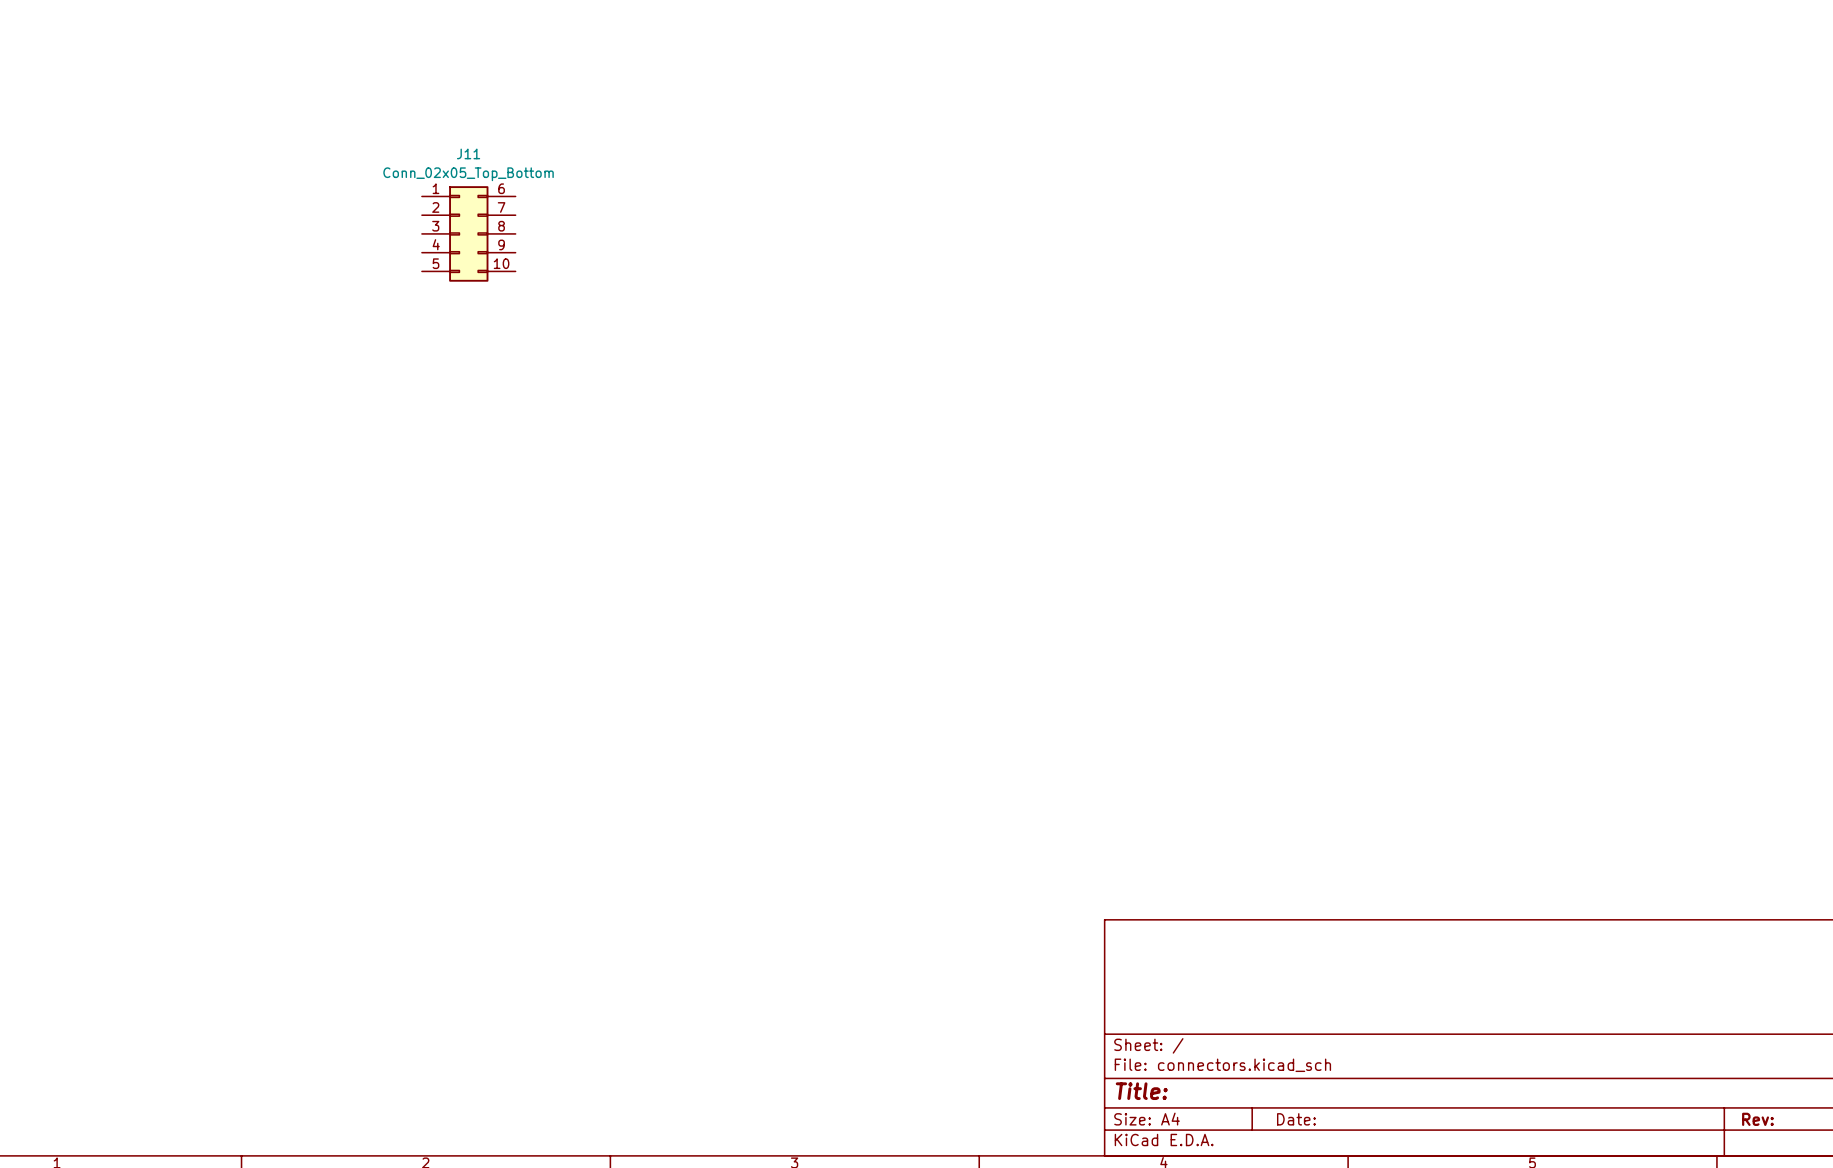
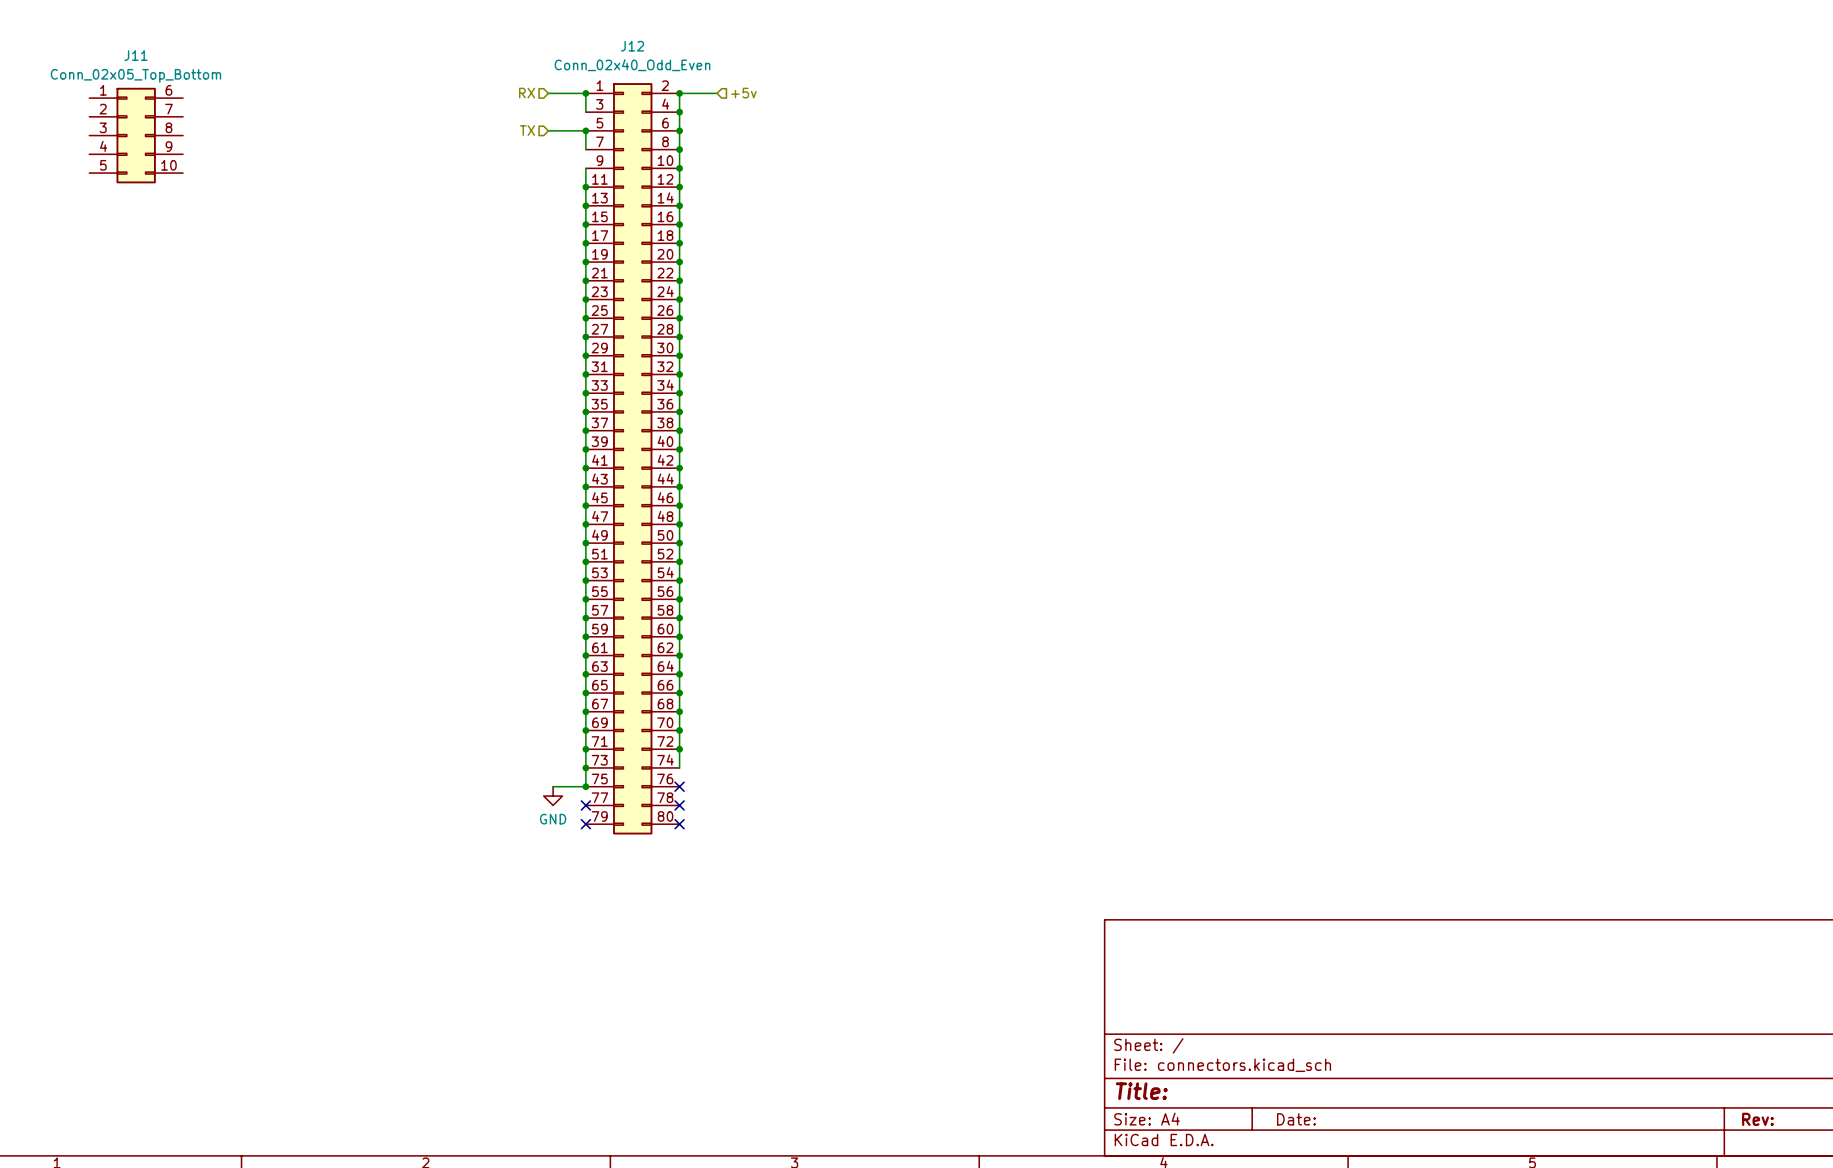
hierarchical label: none -> RX (527, 93)
wire: none -> (548, 93) (585, 93) (585, 112)
junction: none -> (585, 93)
junction: none -> (679, 93)
wire: none -> (717, 93) (679, 93) (679, 767)
hierarchical label: none -> +5v (743, 93)
junction: none -> (679, 112)
hierarchical label: none -> TX (527, 130)
wire: none -> (548, 130) (585, 130) (585, 149)
junction: none -> (585, 130)
junction: none -> (679, 130)
junction: none -> (679, 149)
wire: none -> (585, 168) (585, 786) (553, 786)
junction: none -> (679, 168)
junction: none -> (585, 187)
junction: none -> (679, 187)
junction: none -> (585, 205)
junction: none -> (679, 205)
junction: none -> (585, 224)
junction: none -> (679, 224)
J11 position: (468, 233) -> (136, 135)
junction: none -> (585, 243)
junction: none -> (679, 243)
junction: none -> (585, 262)
junction: none -> (679, 262)
junction: none -> (585, 280)
junction: none -> (679, 280)
junction: none -> (585, 299)
junction: none -> (679, 299)
junction: none -> (585, 318)
junction: none -> (679, 318)
junction: none -> (585, 337)
junction: none -> (679, 337)
junction: none -> (585, 355)
junction: none -> (679, 355)
junction: none -> (585, 374)
junction: none -> (679, 374)
junction: none -> (585, 393)
junction: none -> (679, 393)
junction: none -> (585, 411)
junction: none -> (679, 411)
junction: none -> (585, 430)
junction: none -> (679, 430)
junction: none -> (585, 449)
junction: none -> (679, 449)
J12: none -> Conn_02x40_Odd_Even (632, 458)
junction: none -> (585, 468)
junction: none -> (679, 468)
junction: none -> (585, 486)
junction: none -> (679, 486)
junction: none -> (585, 505)
junction: none -> (679, 505)
junction: none -> (585, 524)
junction: none -> (679, 524)
junction: none -> (585, 543)
junction: none -> (679, 543)
junction: none -> (585, 561)
junction: none -> (679, 561)
junction: none -> (585, 580)
junction: none -> (679, 580)
junction: none -> (585, 599)
junction: none -> (679, 599)
junction: none -> (585, 618)
junction: none -> (679, 618)
junction: none -> (585, 636)
junction: none -> (679, 636)
junction: none -> (585, 655)
junction: none -> (679, 655)
junction: none -> (585, 674)
junction: none -> (679, 674)
junction: none -> (585, 693)
junction: none -> (679, 693)
junction: none -> (585, 711)
junction: none -> (679, 711)
junction: none -> (585, 730)
junction: none -> (679, 730)
junction: none -> (585, 749)
junction: none -> (679, 749)
junction: none -> (585, 767)
junction: none -> (585, 786)
no-connect mark: none -> (679, 786)
power symbol: none -> GND (553, 796)
no-connect mark: none -> (585, 805)
no-connect mark: none -> (679, 805)
no-connect mark: none -> (585, 824)
no-connect mark: none -> (679, 824)

